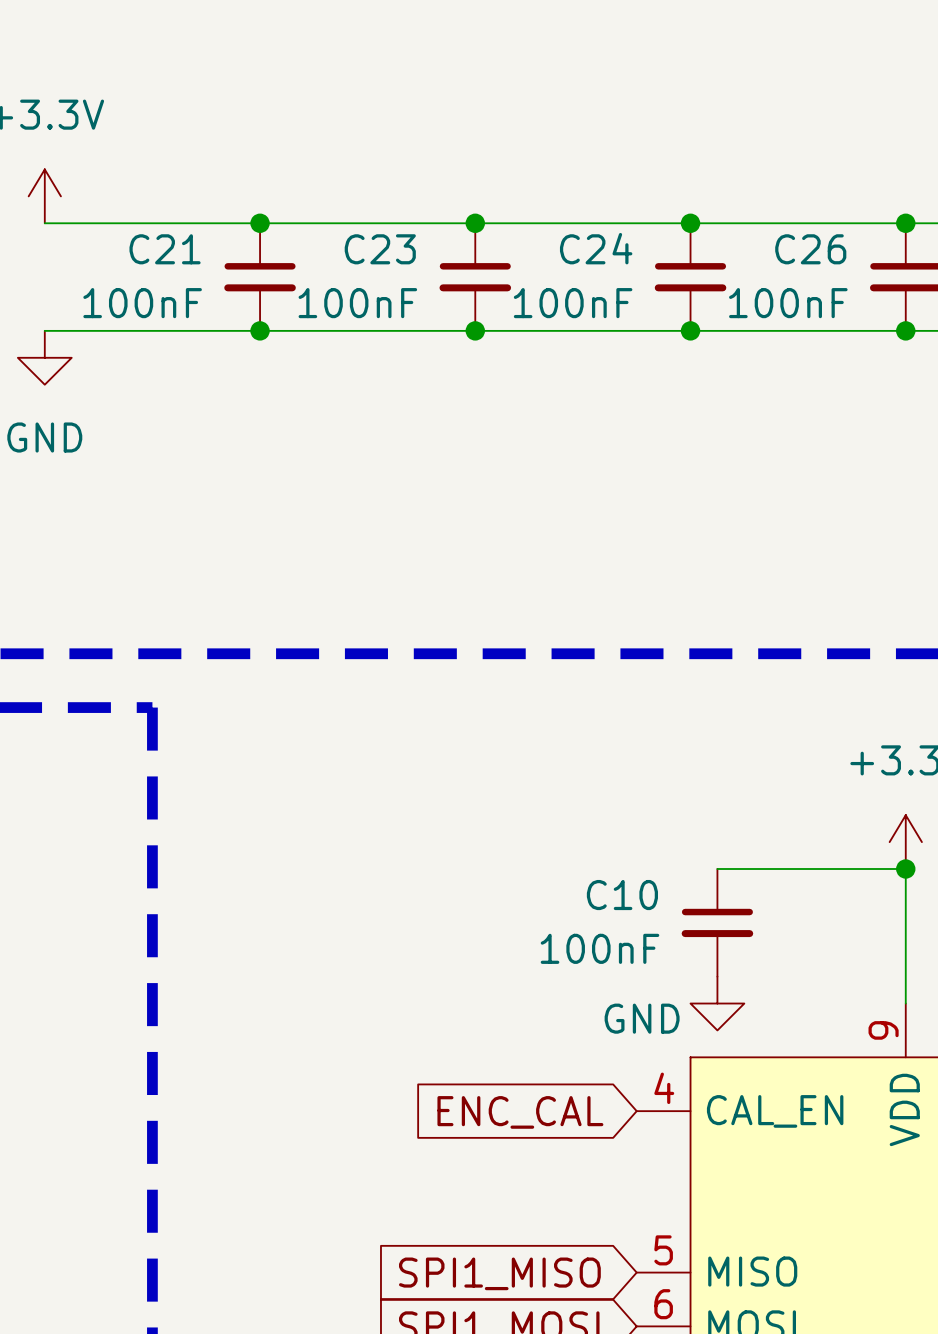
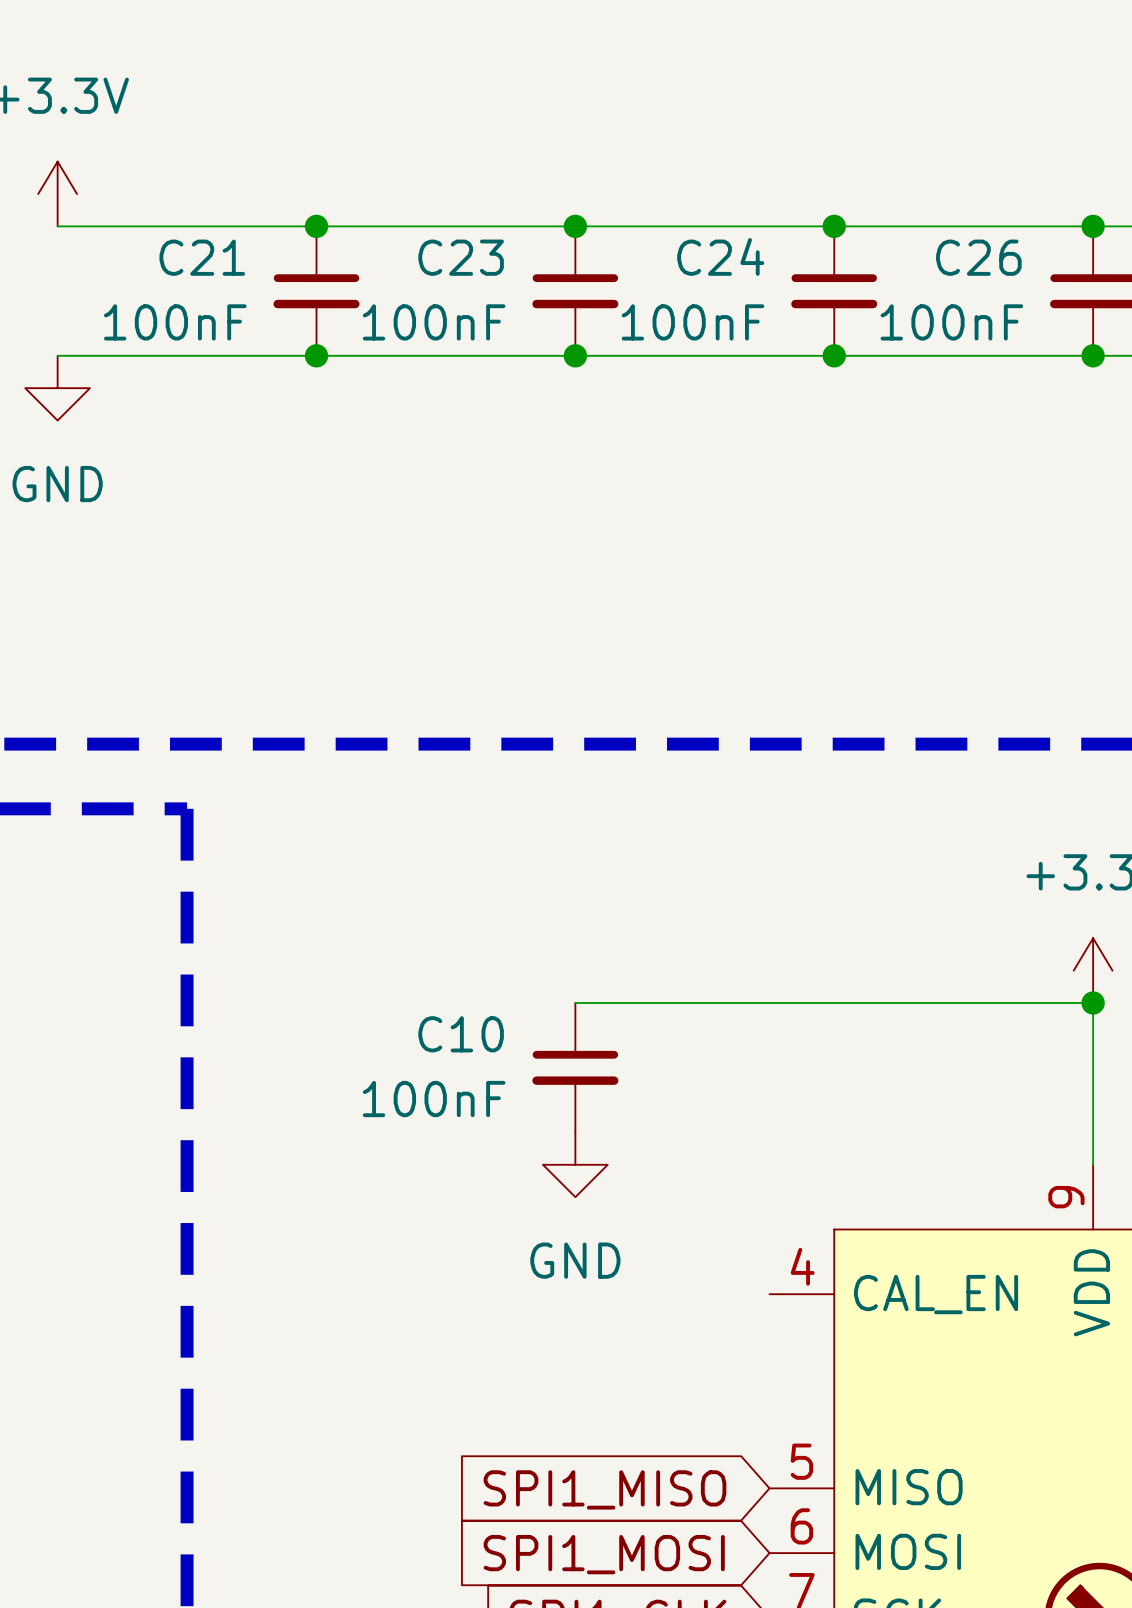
wire: none -> (575, 1002) (866, 1002)
C10 position: (717, 922) -> (575, 1067)
power symbol position: GND (717, 1003) -> GND (575, 1164)
power symbol text position: GND (642, 1018) -> GND (575, 1260)
global label: ENC_CAL (520, 1112) -> none

